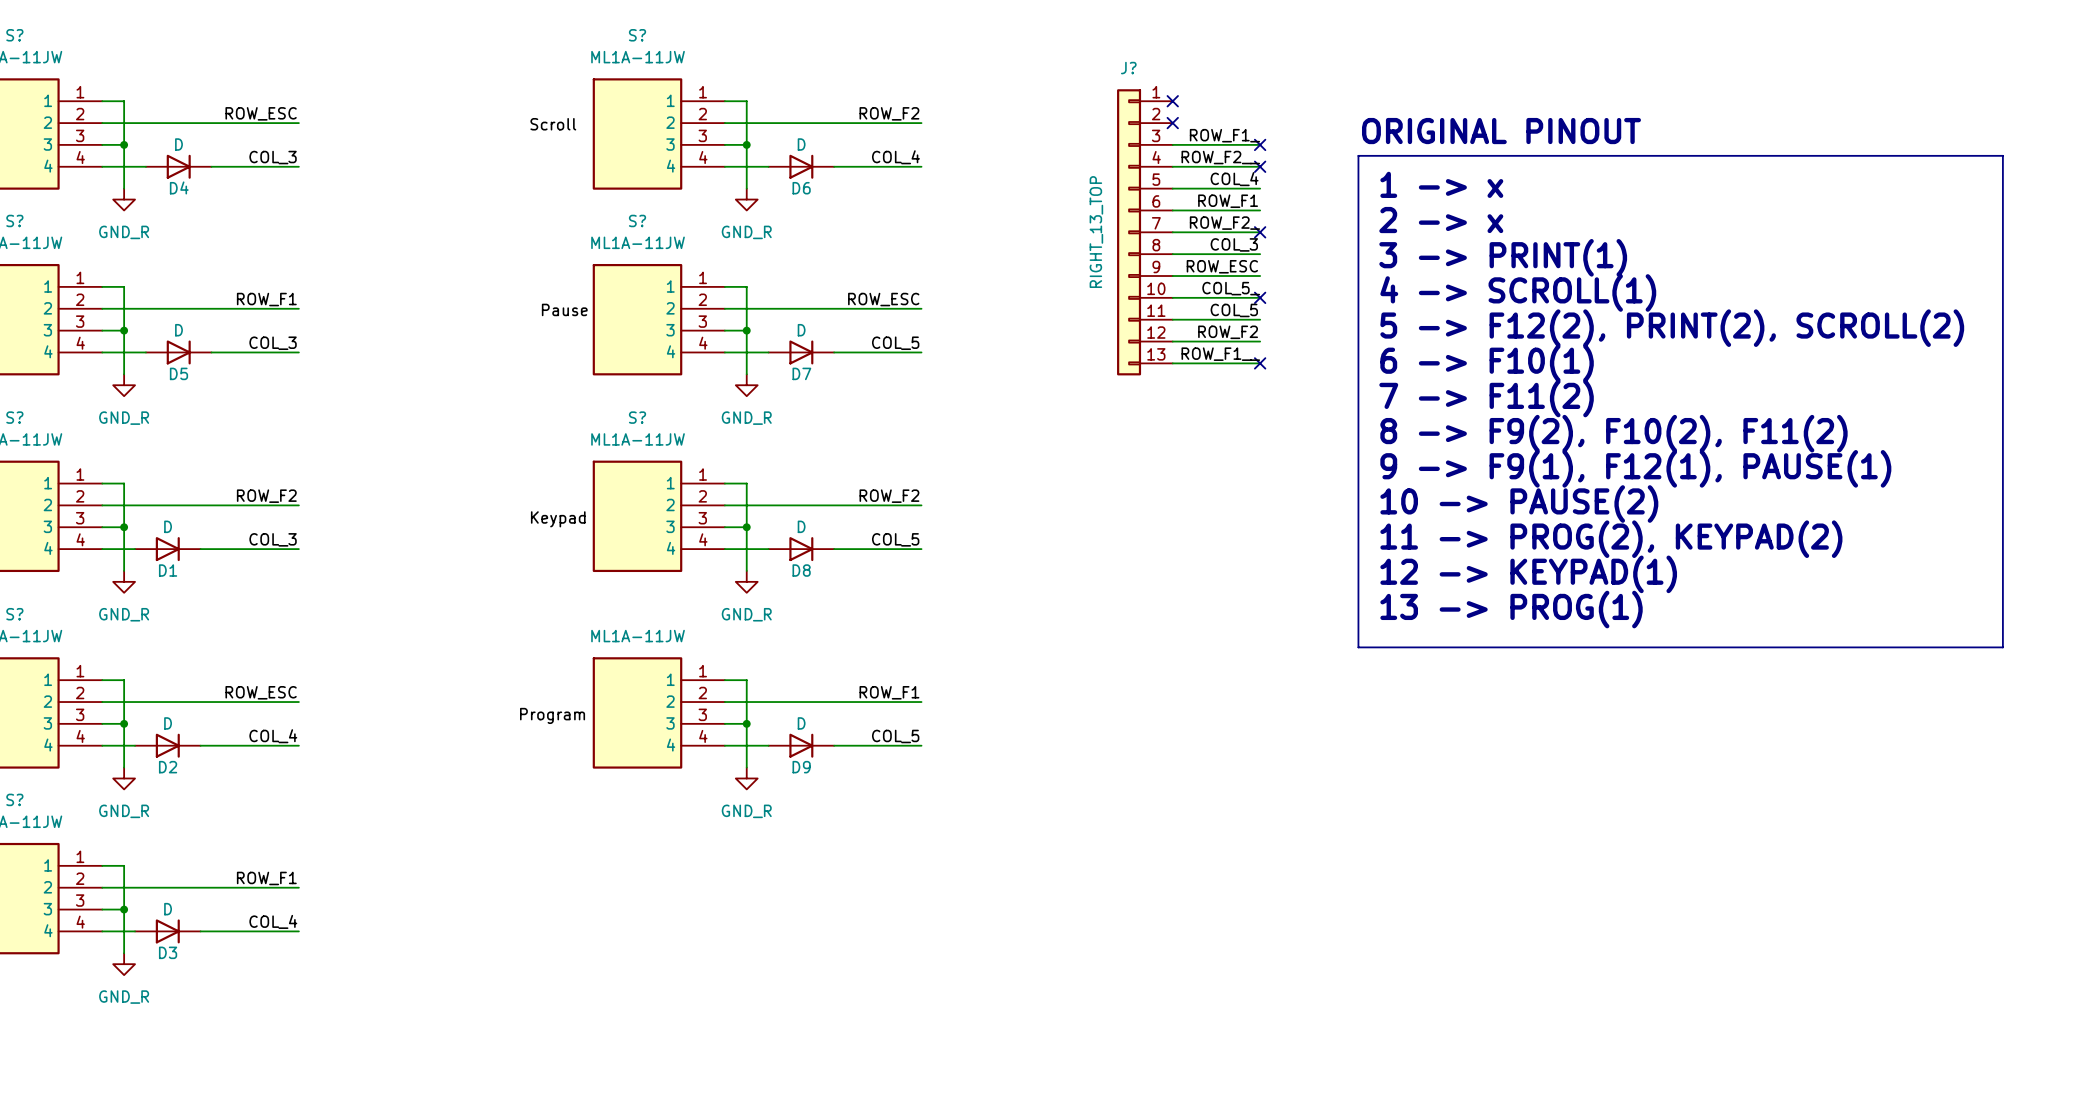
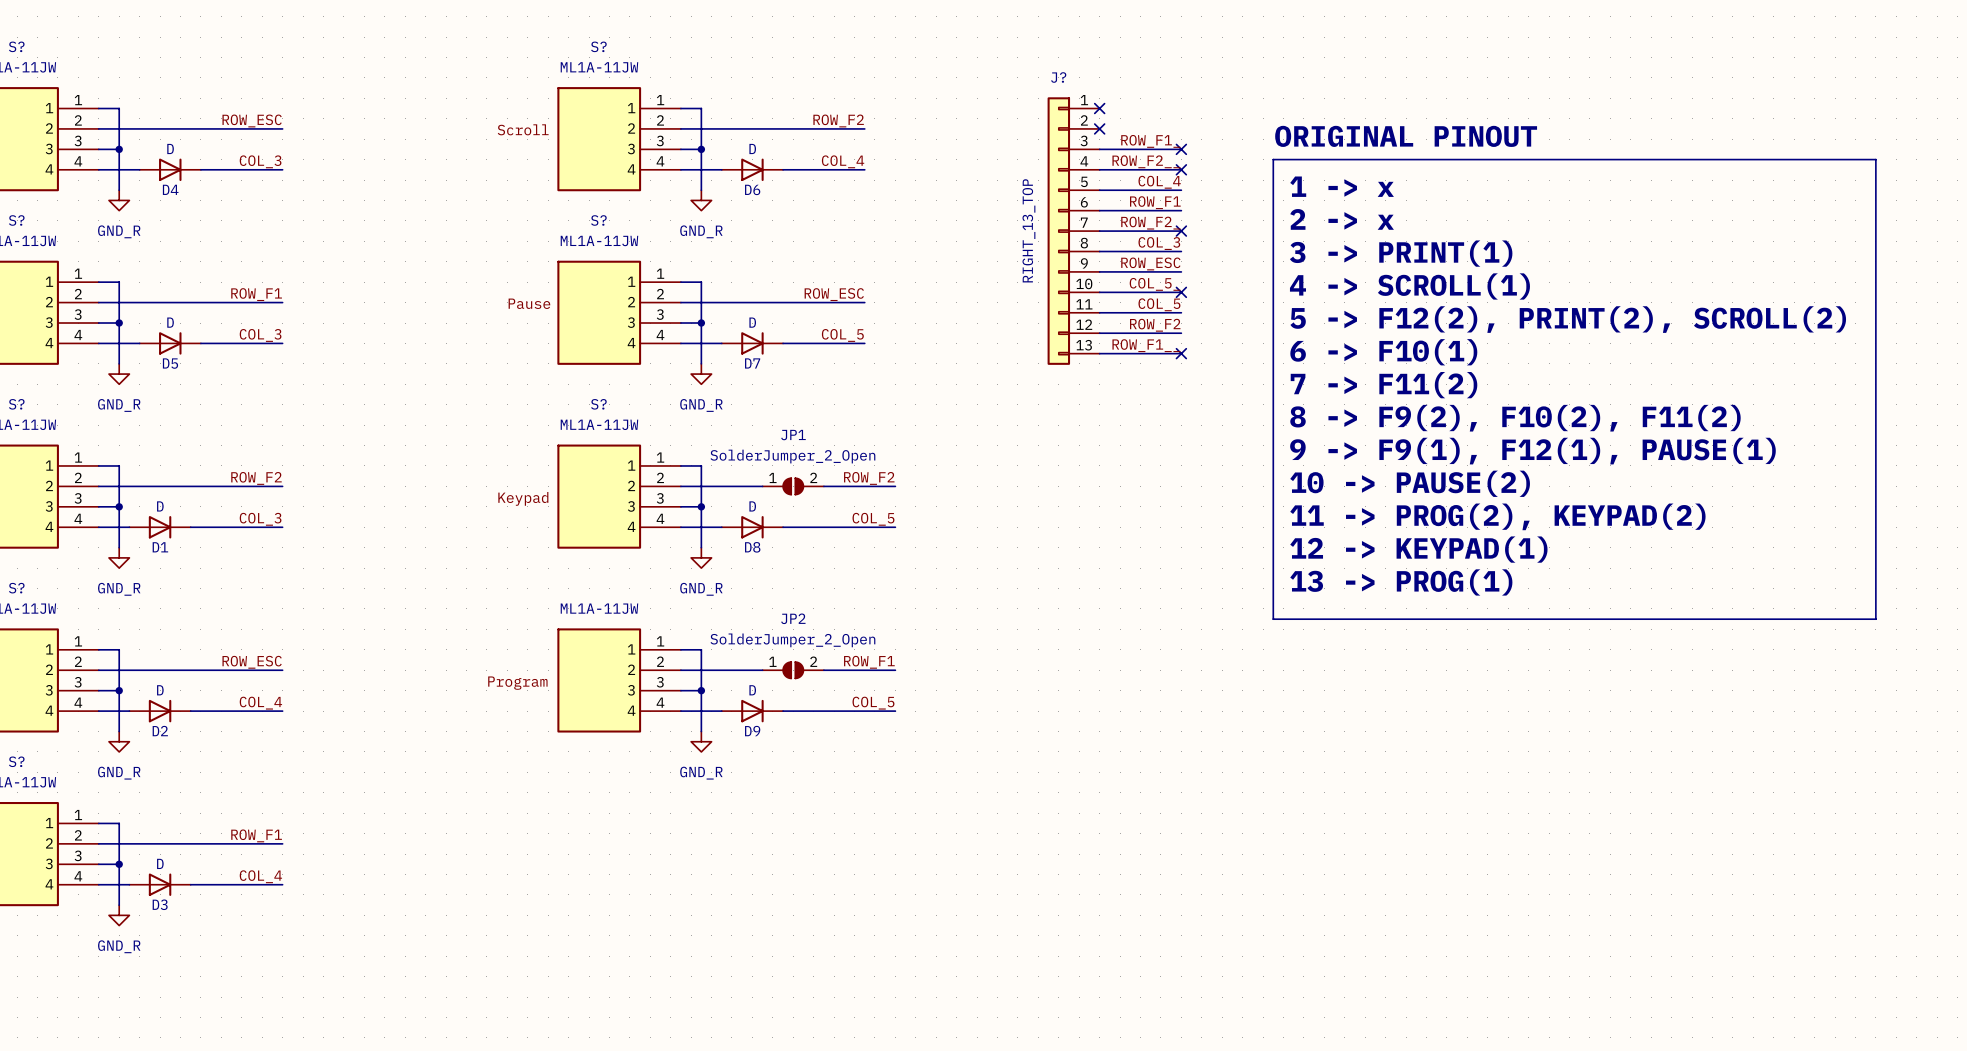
label position: ROW_F2 (889, 496) -> ROW_F2 (869, 478)
JP1: none -> SolderJumper_2_Open (793, 486)
wire: none -> (864, 486) (895, 486)
label position: COL_5 (895, 539) -> COL_5 (873, 519)
wire: none -> (864, 527) (895, 527)
label position: ROW_F1 (889, 692) -> ROW_F1 (869, 662)
JP2: none -> SolderJumper_2_Open (793, 670)
wire: none -> (864, 670) (895, 670)
label position: COL_5 (895, 736) -> COL_5 (873, 703)
wire: none -> (864, 711) (895, 711)

